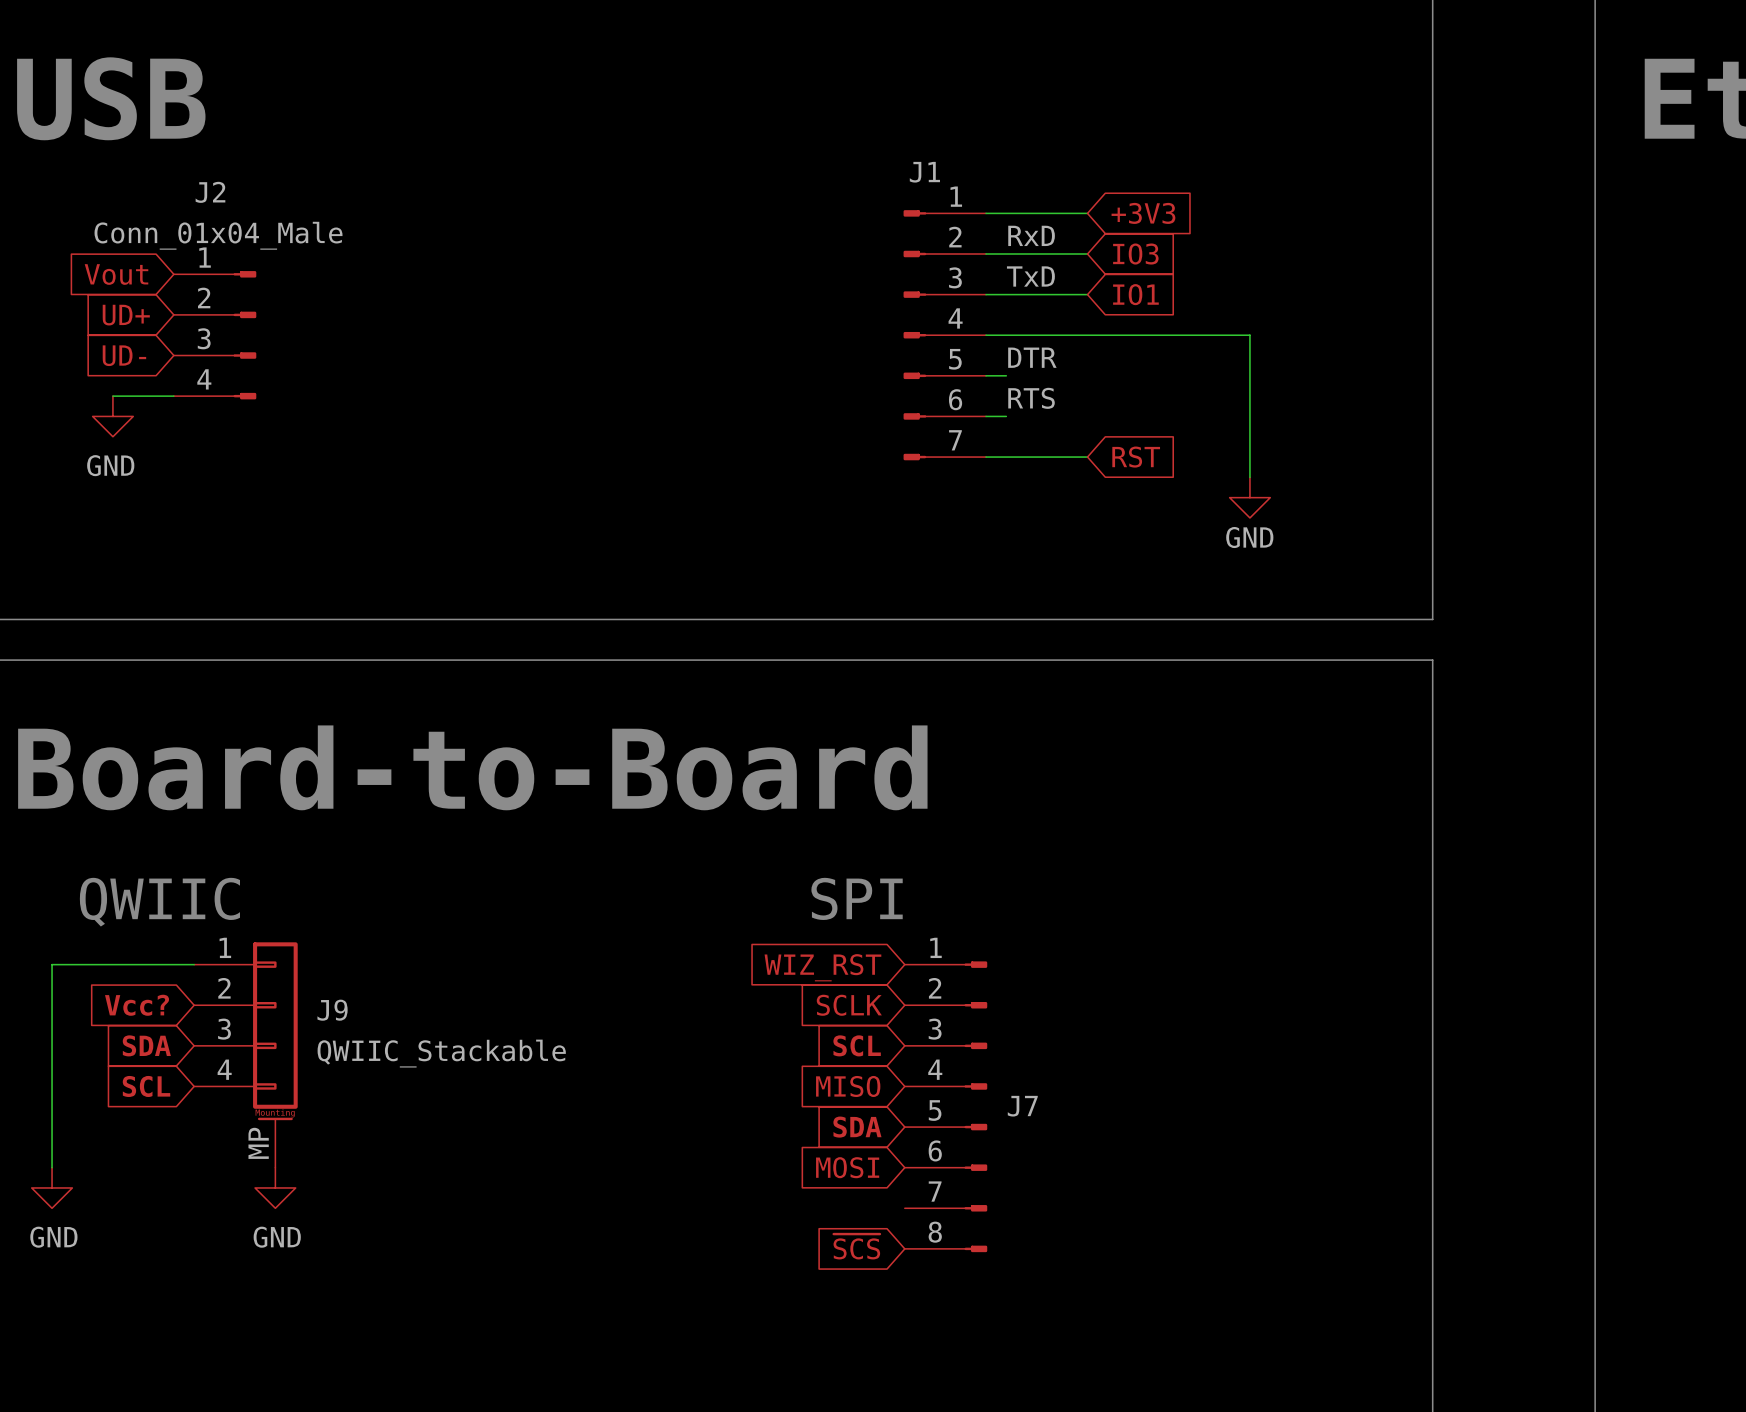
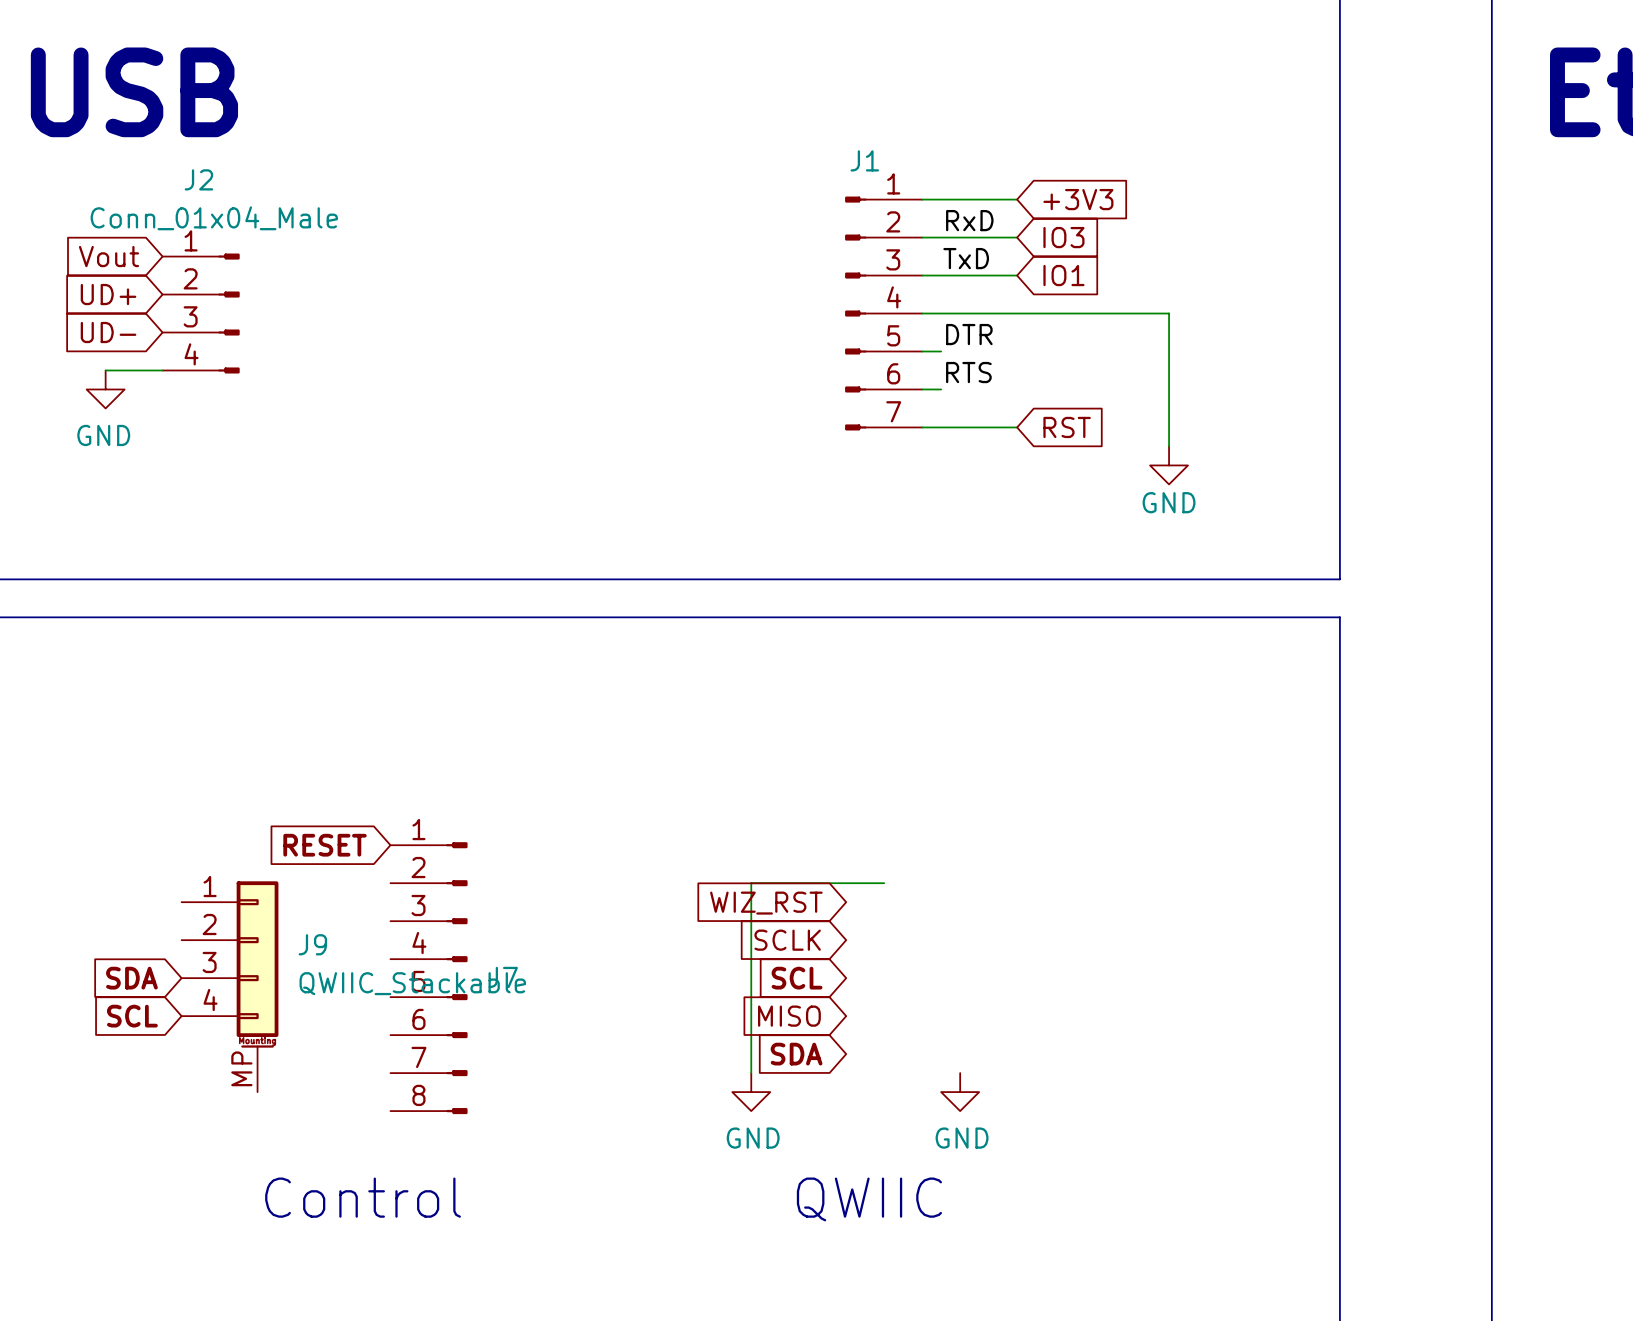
text: Board-to-Board (472, 767) -> none
text: SPI (857, 898) -> none
text: QWIIC (159, 902) -> none
global label: none -> RESET (325, 845)
wire: none -> (884, 883) (751, 883) (751, 1073)
wire: (194, 964) (52, 964) (52, 1167) -> none
global label: Vcc? (137, 1005) -> none
J7 position: (946, 1106) -> (429, 978)
power symbol: none -> GND (751, 1092)
global label: MOSI (847, 1167) -> none
power symbol: none -> GND (960, 1092)
power symbol: GND (52, 1187) -> none
power symbol: GND (275, 1187) -> none
global label: ~{SCS} (856, 1246) -> none
text: none -> Control (363, 1197)
text: none -> QWIIC (869, 1199)

